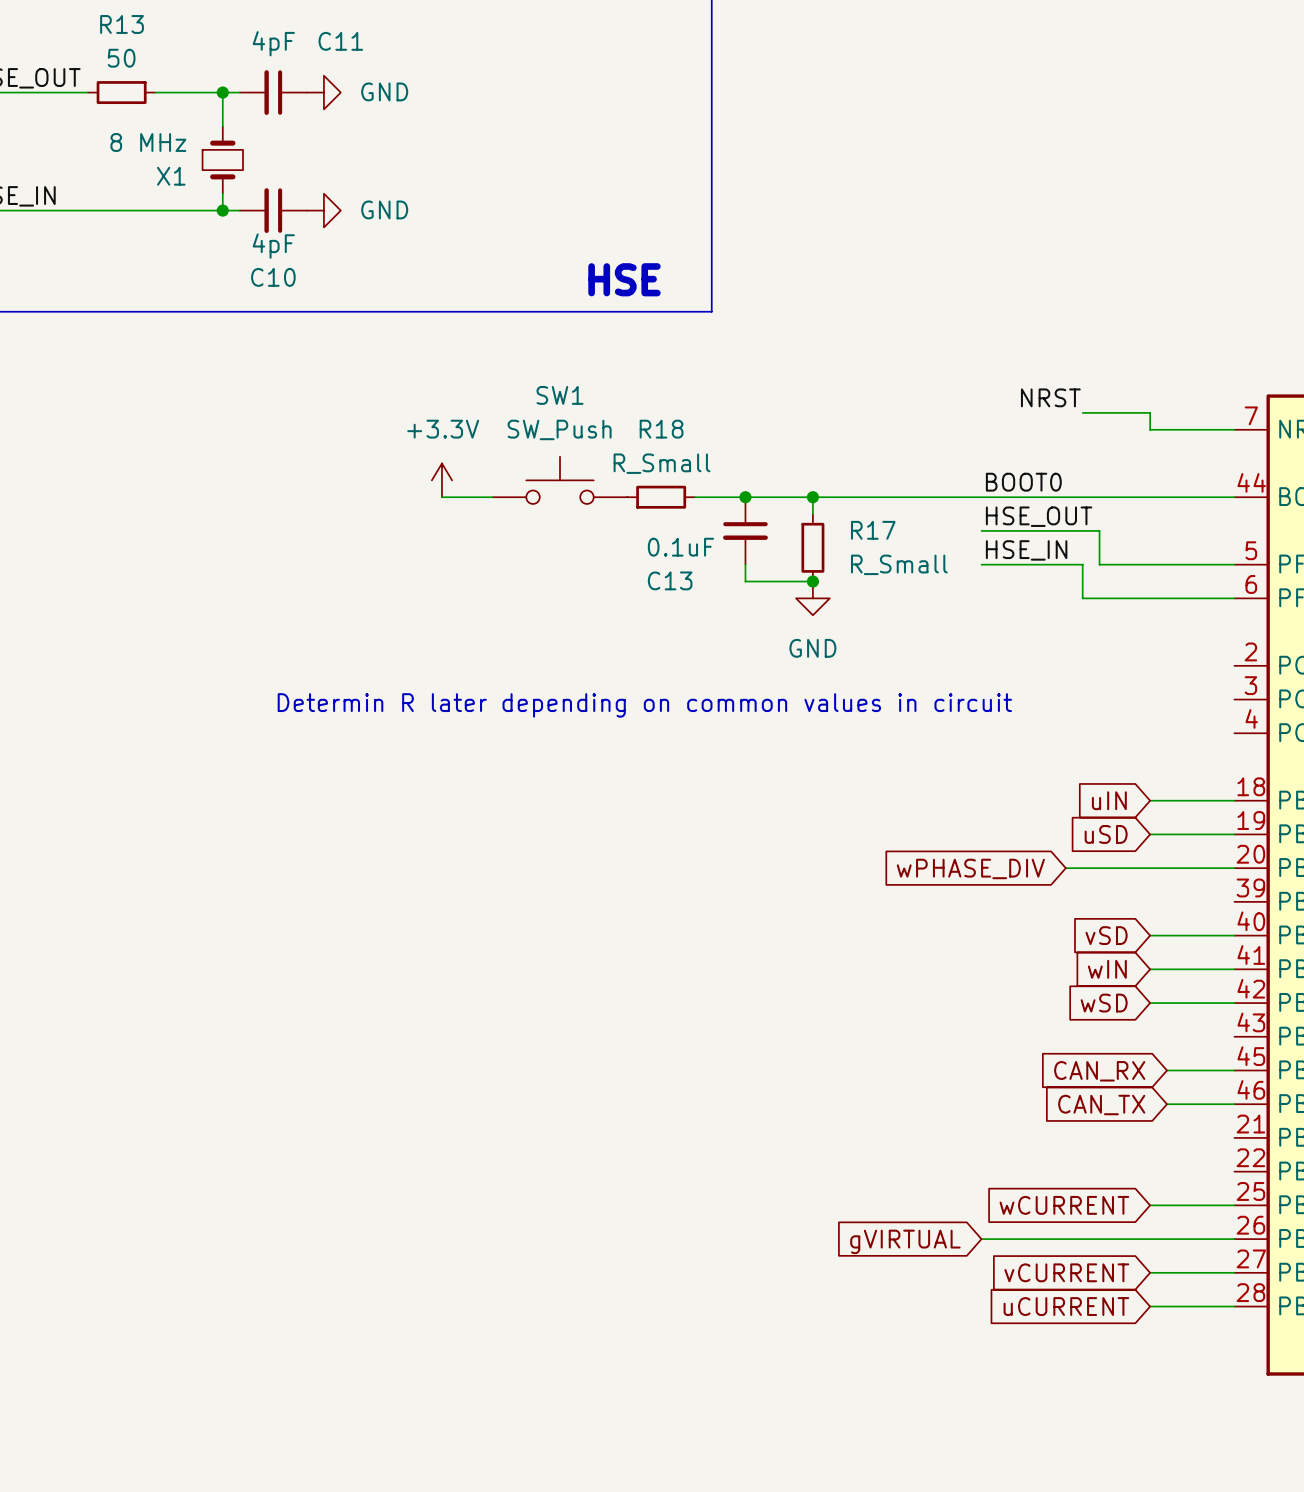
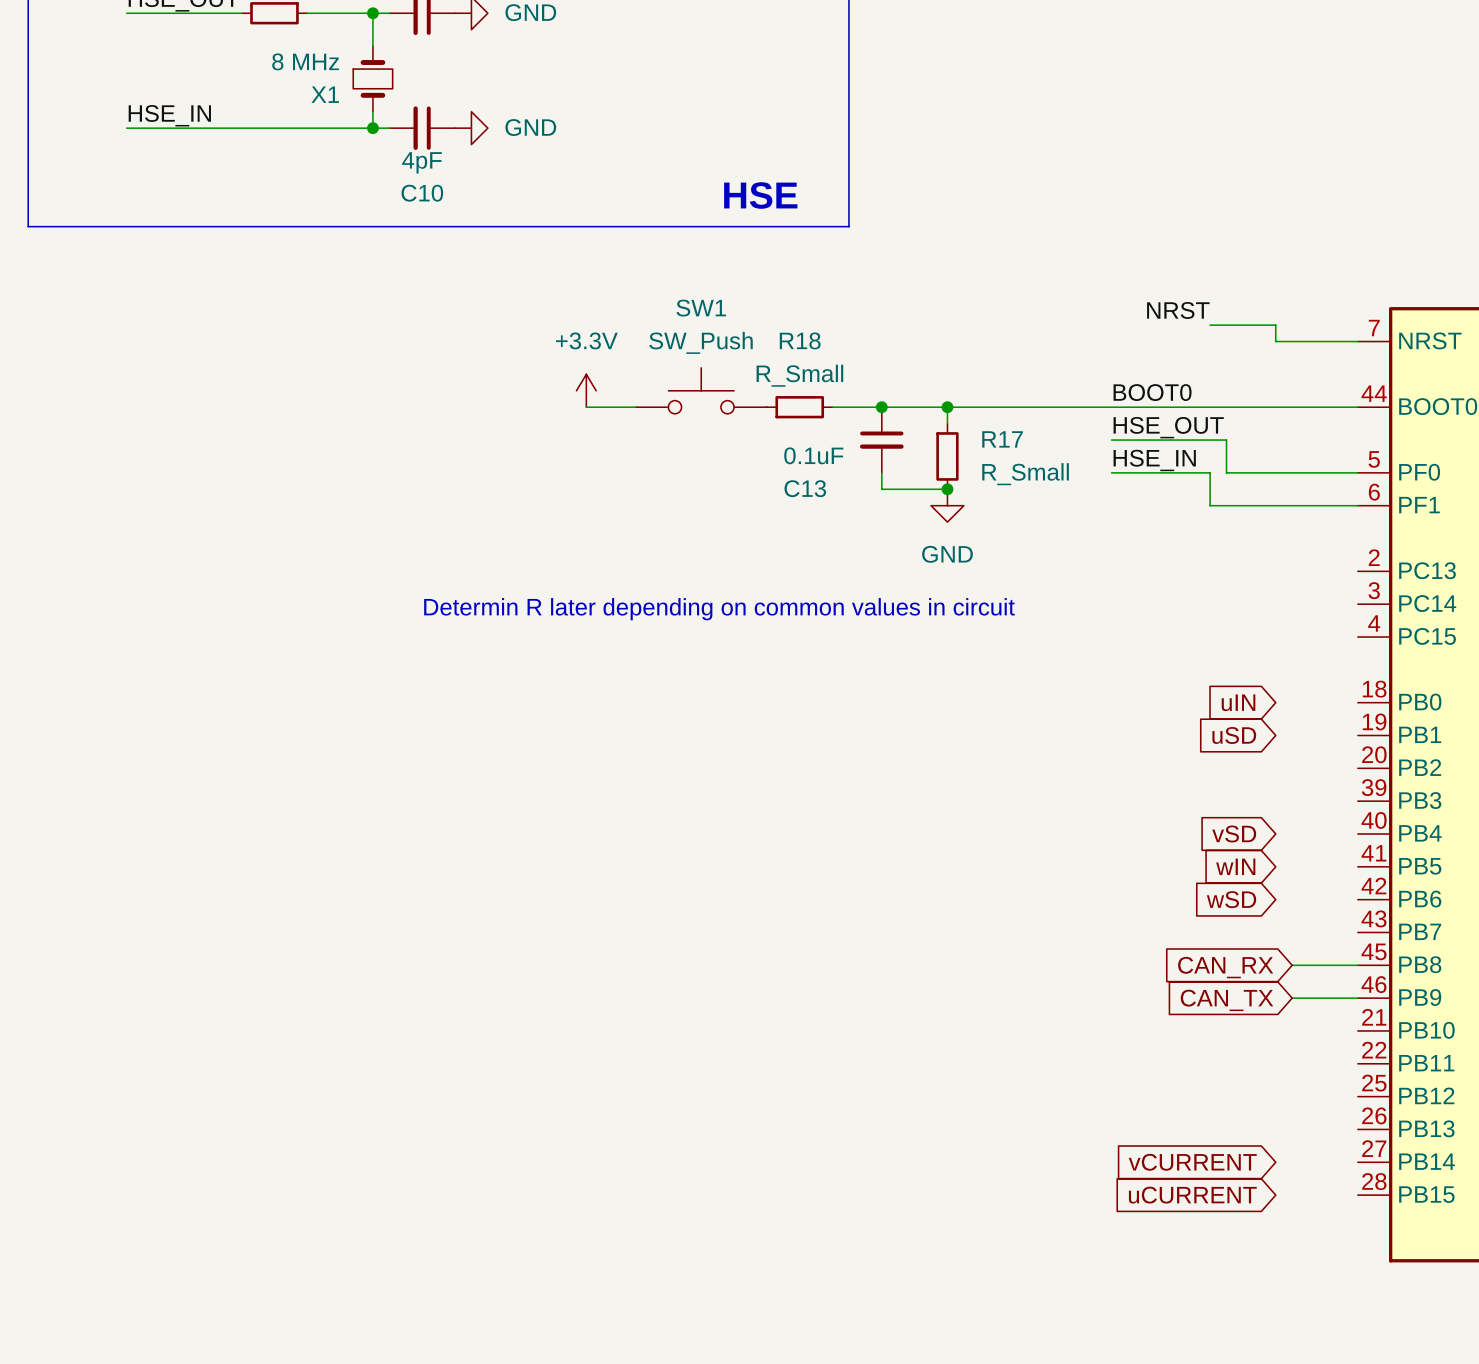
wire: (1150, 800) (1234, 800) -> none
wire: (1150, 834) (1234, 834) -> none
global label: wPHASE_DIV (970, 868) -> none
wire: (1065, 868) (1234, 868) -> none
wire: (1150, 935) (1234, 935) -> none
wire: (1150, 969) (1234, 969) -> none
wire: (1150, 1003) (1234, 1003) -> none
global label: wCURRENT (1064, 1205) -> none
wire: (1150, 1205) (1234, 1205) -> none
wire: (981, 1239) (1234, 1239) -> none
global label: gVIRTUAL (905, 1241) -> none
wire: (1150, 1272) (1234, 1272) -> none
wire: (1150, 1306) (1234, 1306) -> none

